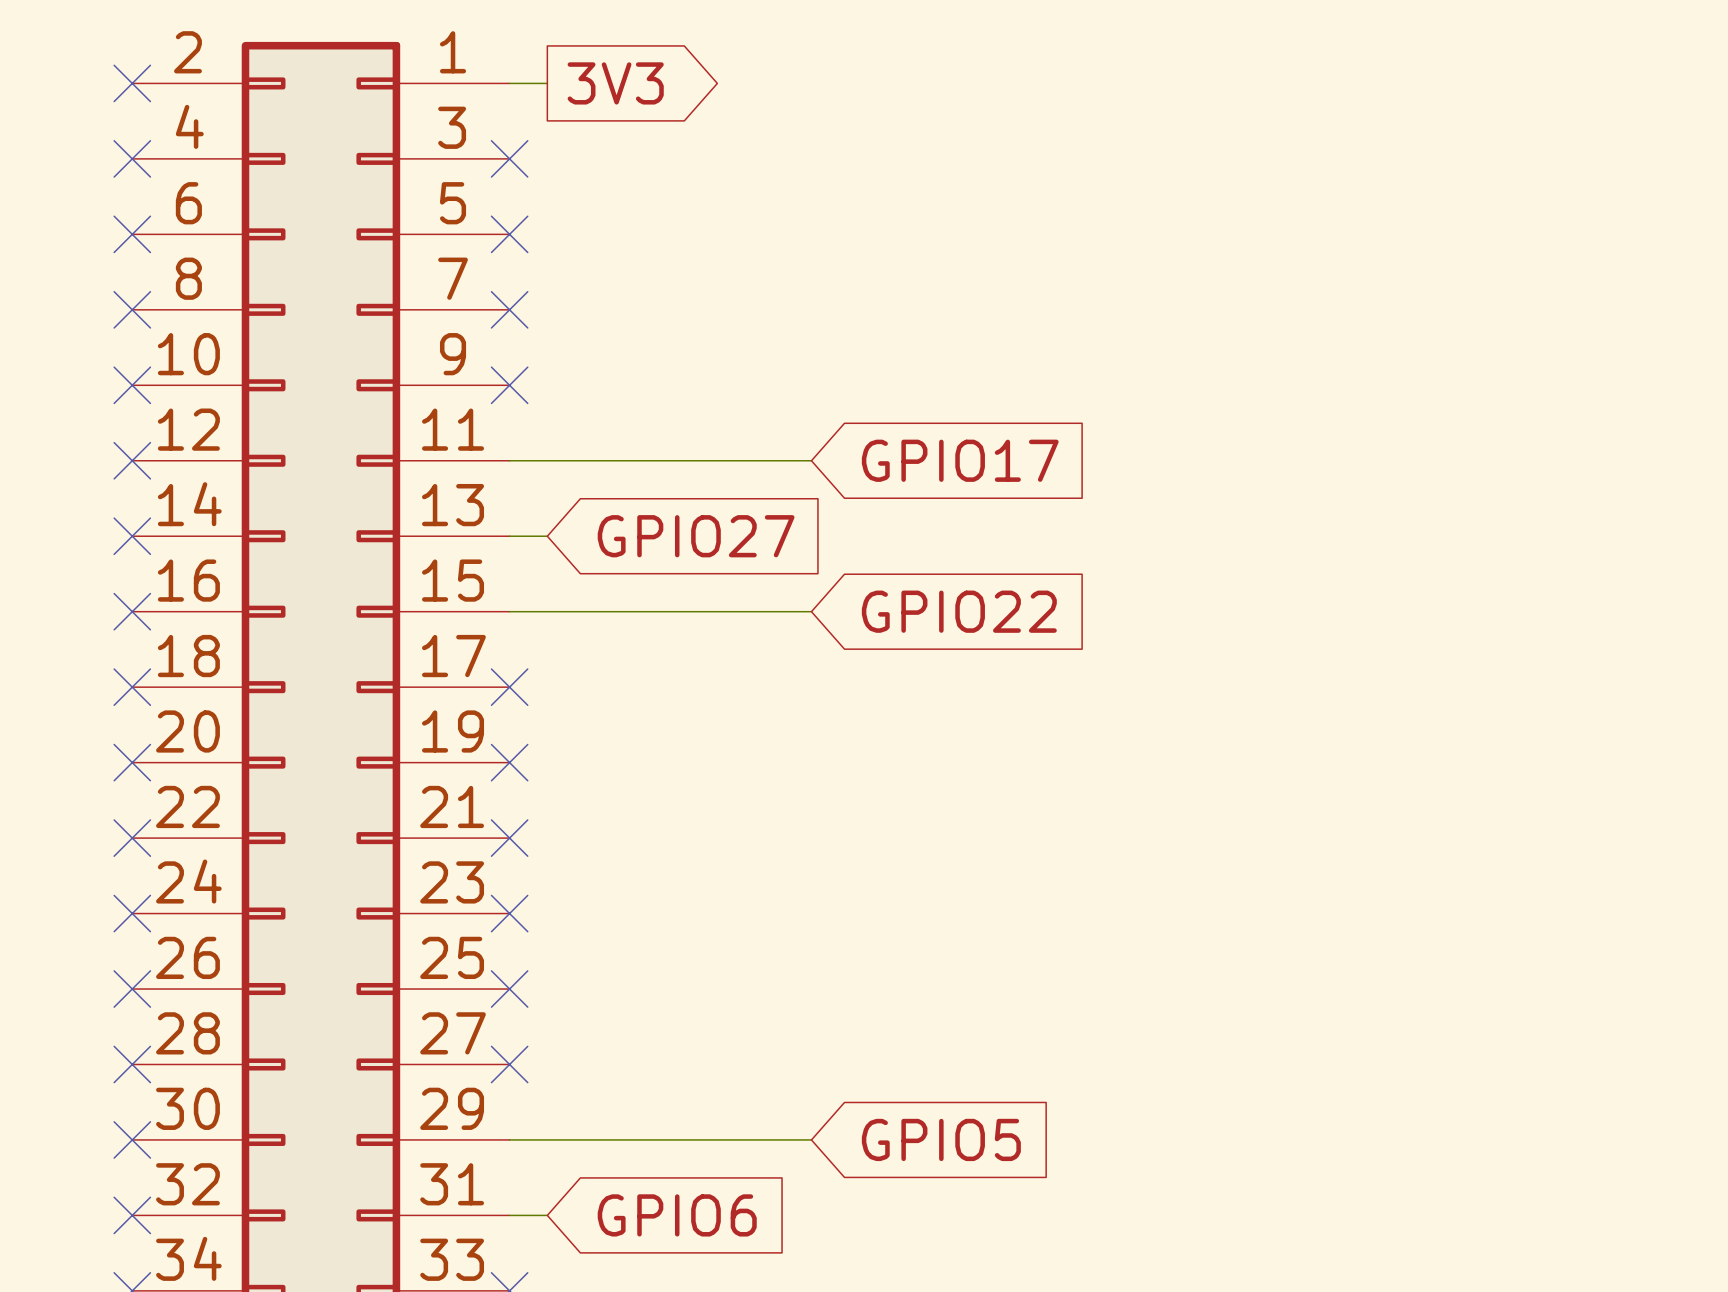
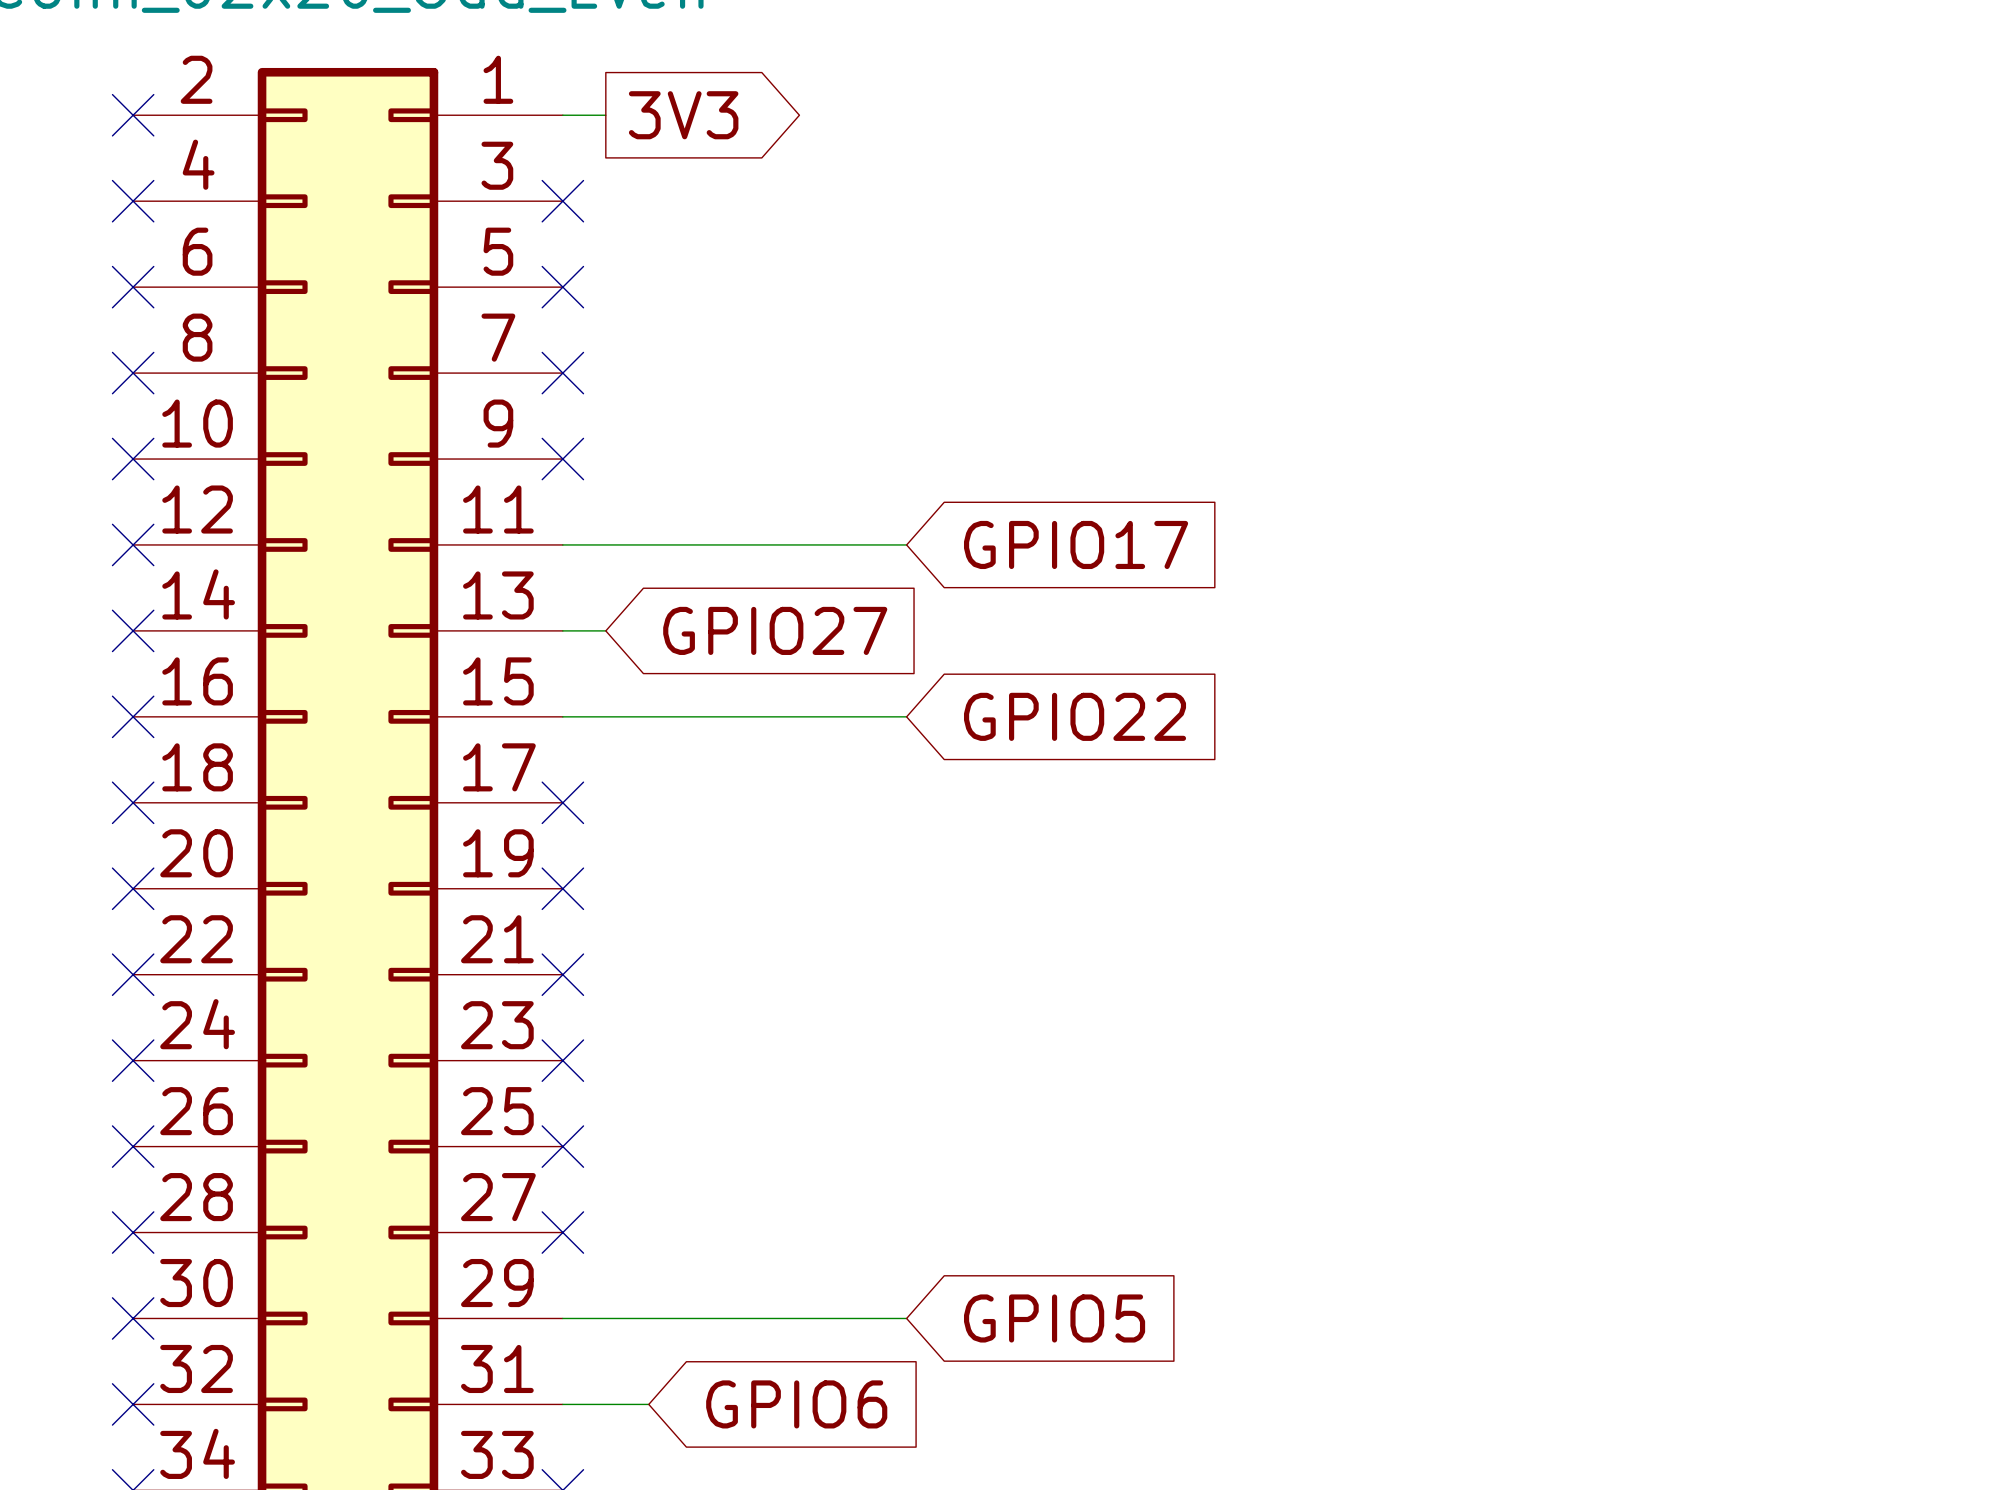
wire: none -> (605, 1404) (648, 1404)
global label position: GPIO6 (677, 1215) -> GPIO6 (796, 1404)

